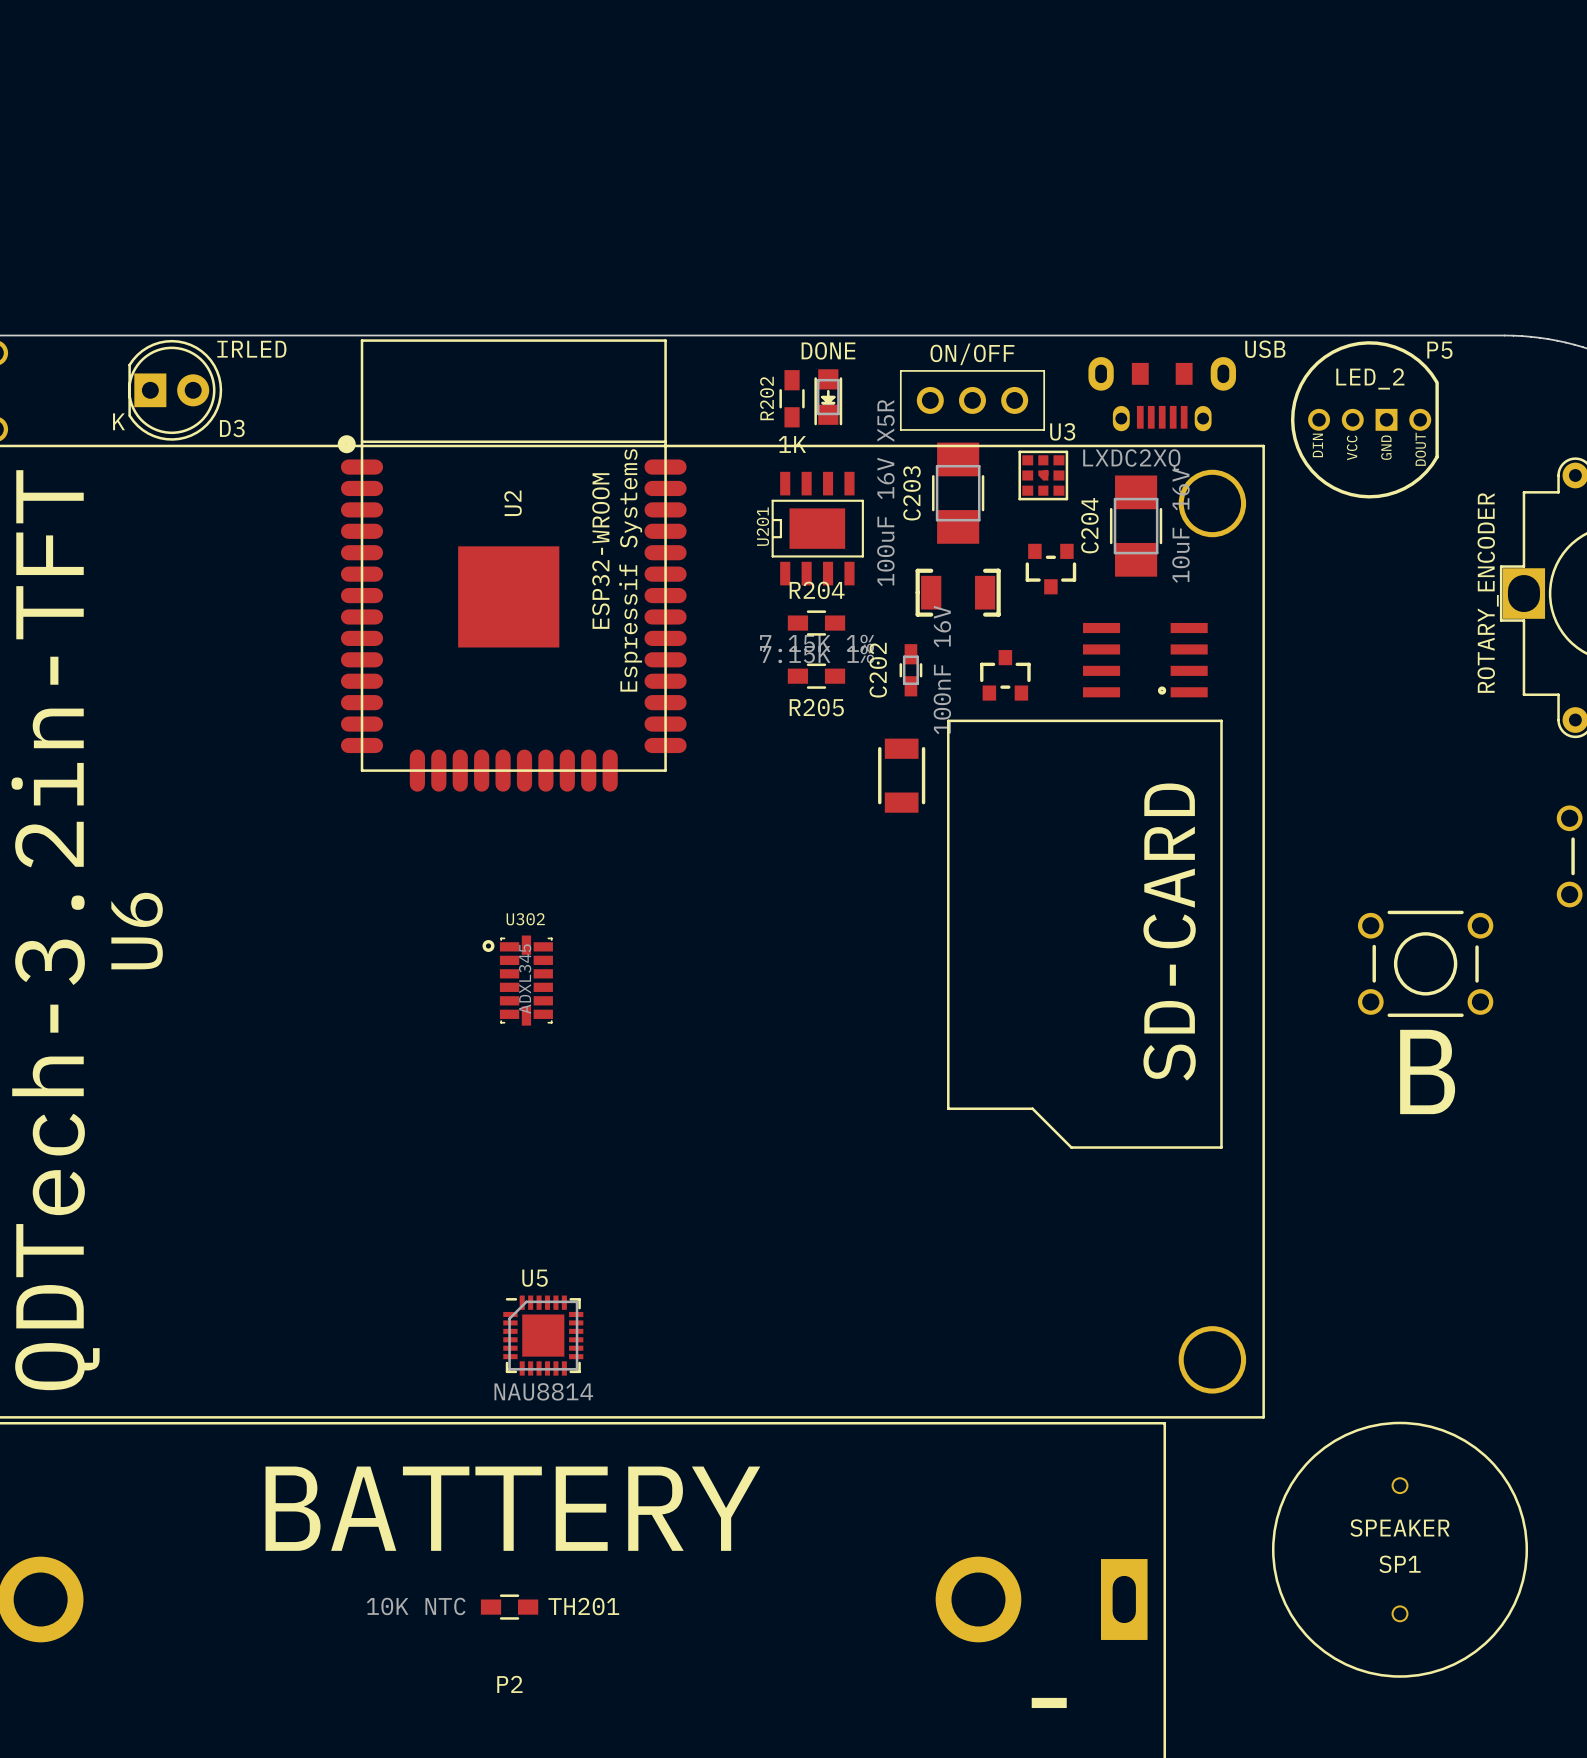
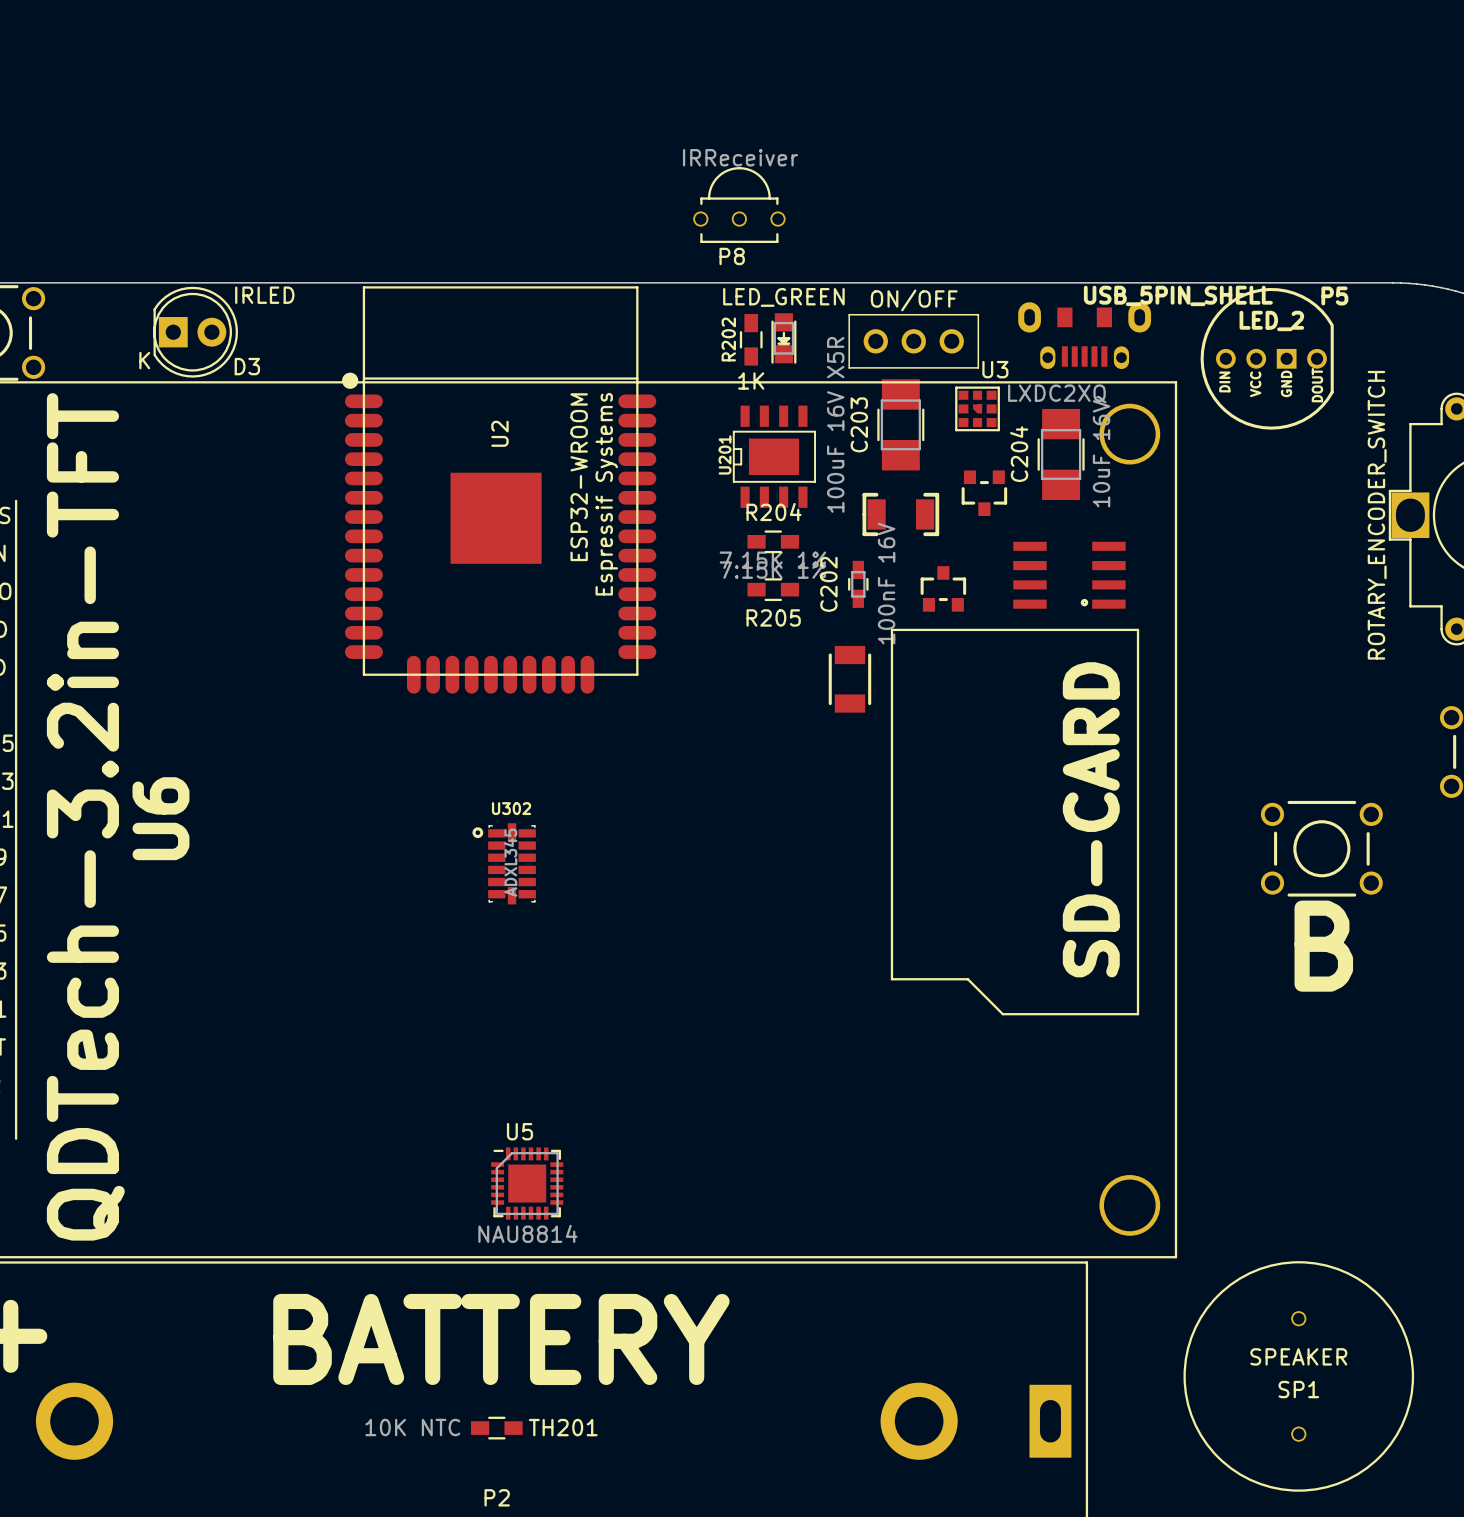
P8: none -> IRReceiver (739, 205)
part value: USB (1265, 349) -> USB_5PIN_SHELL (1178, 295)
part value: DONE (828, 350) -> LED_GREEN (783, 297)
part value: ROTARY_ENCODER (1488, 593) -> ROTARY_ENCODER_SWITCH (1377, 515)

